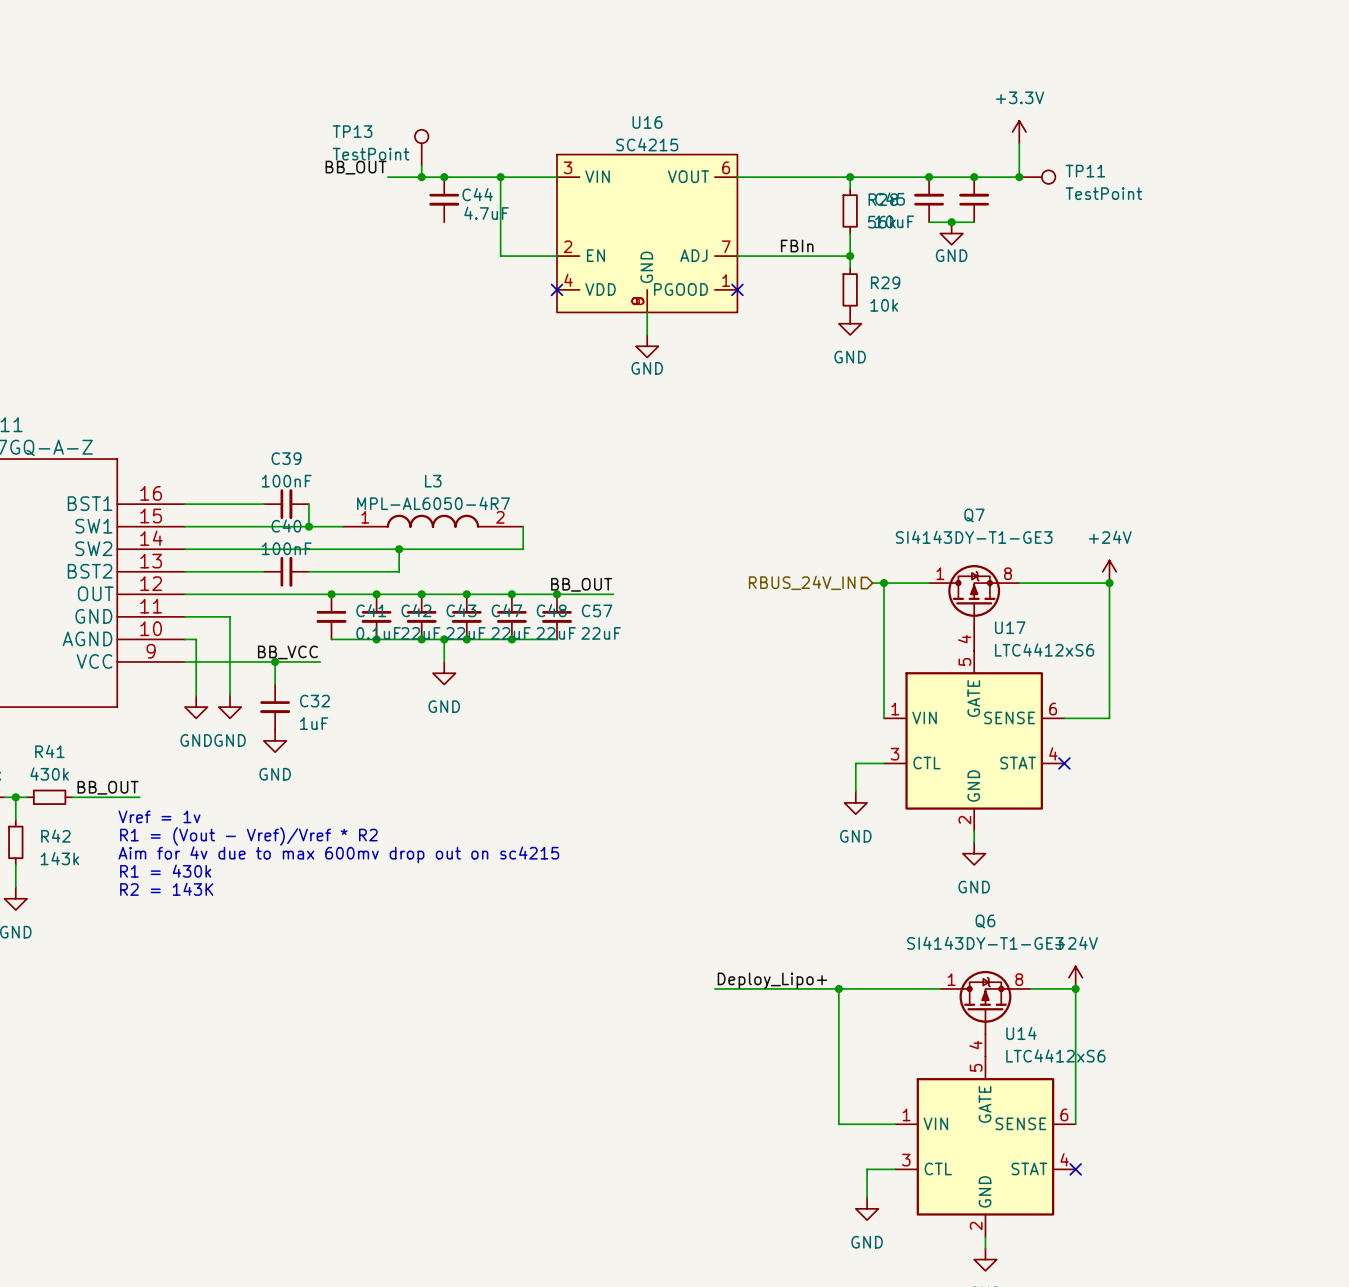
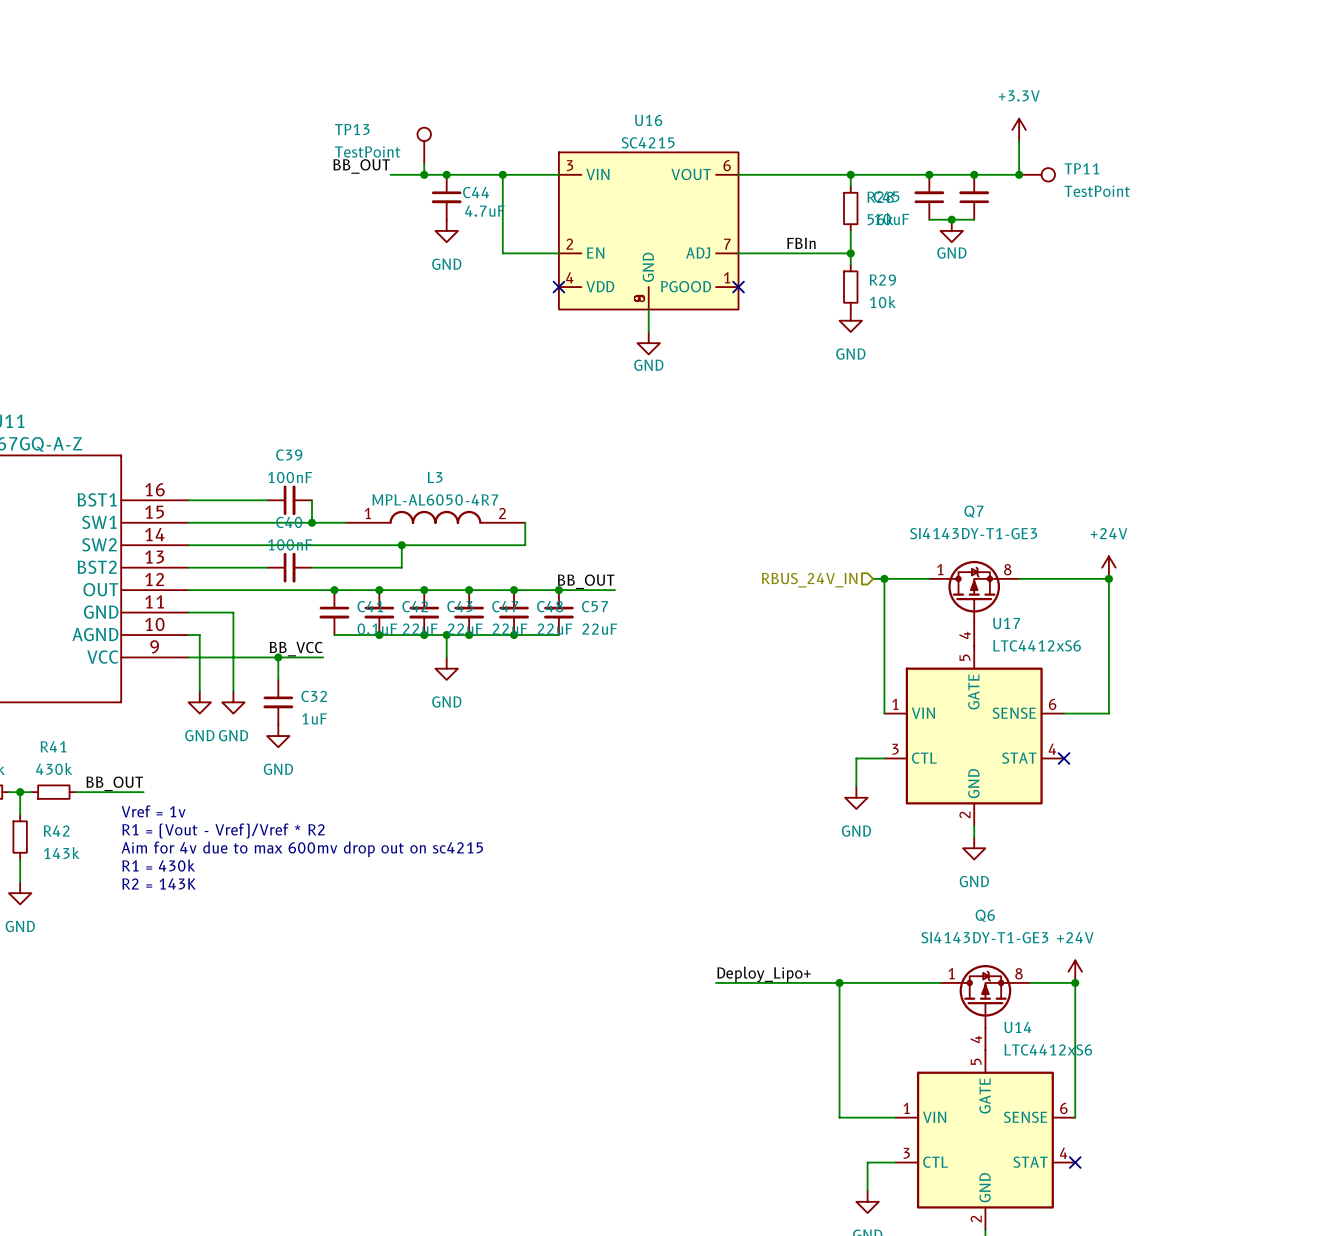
power symbol: none -> GND (446, 230)

